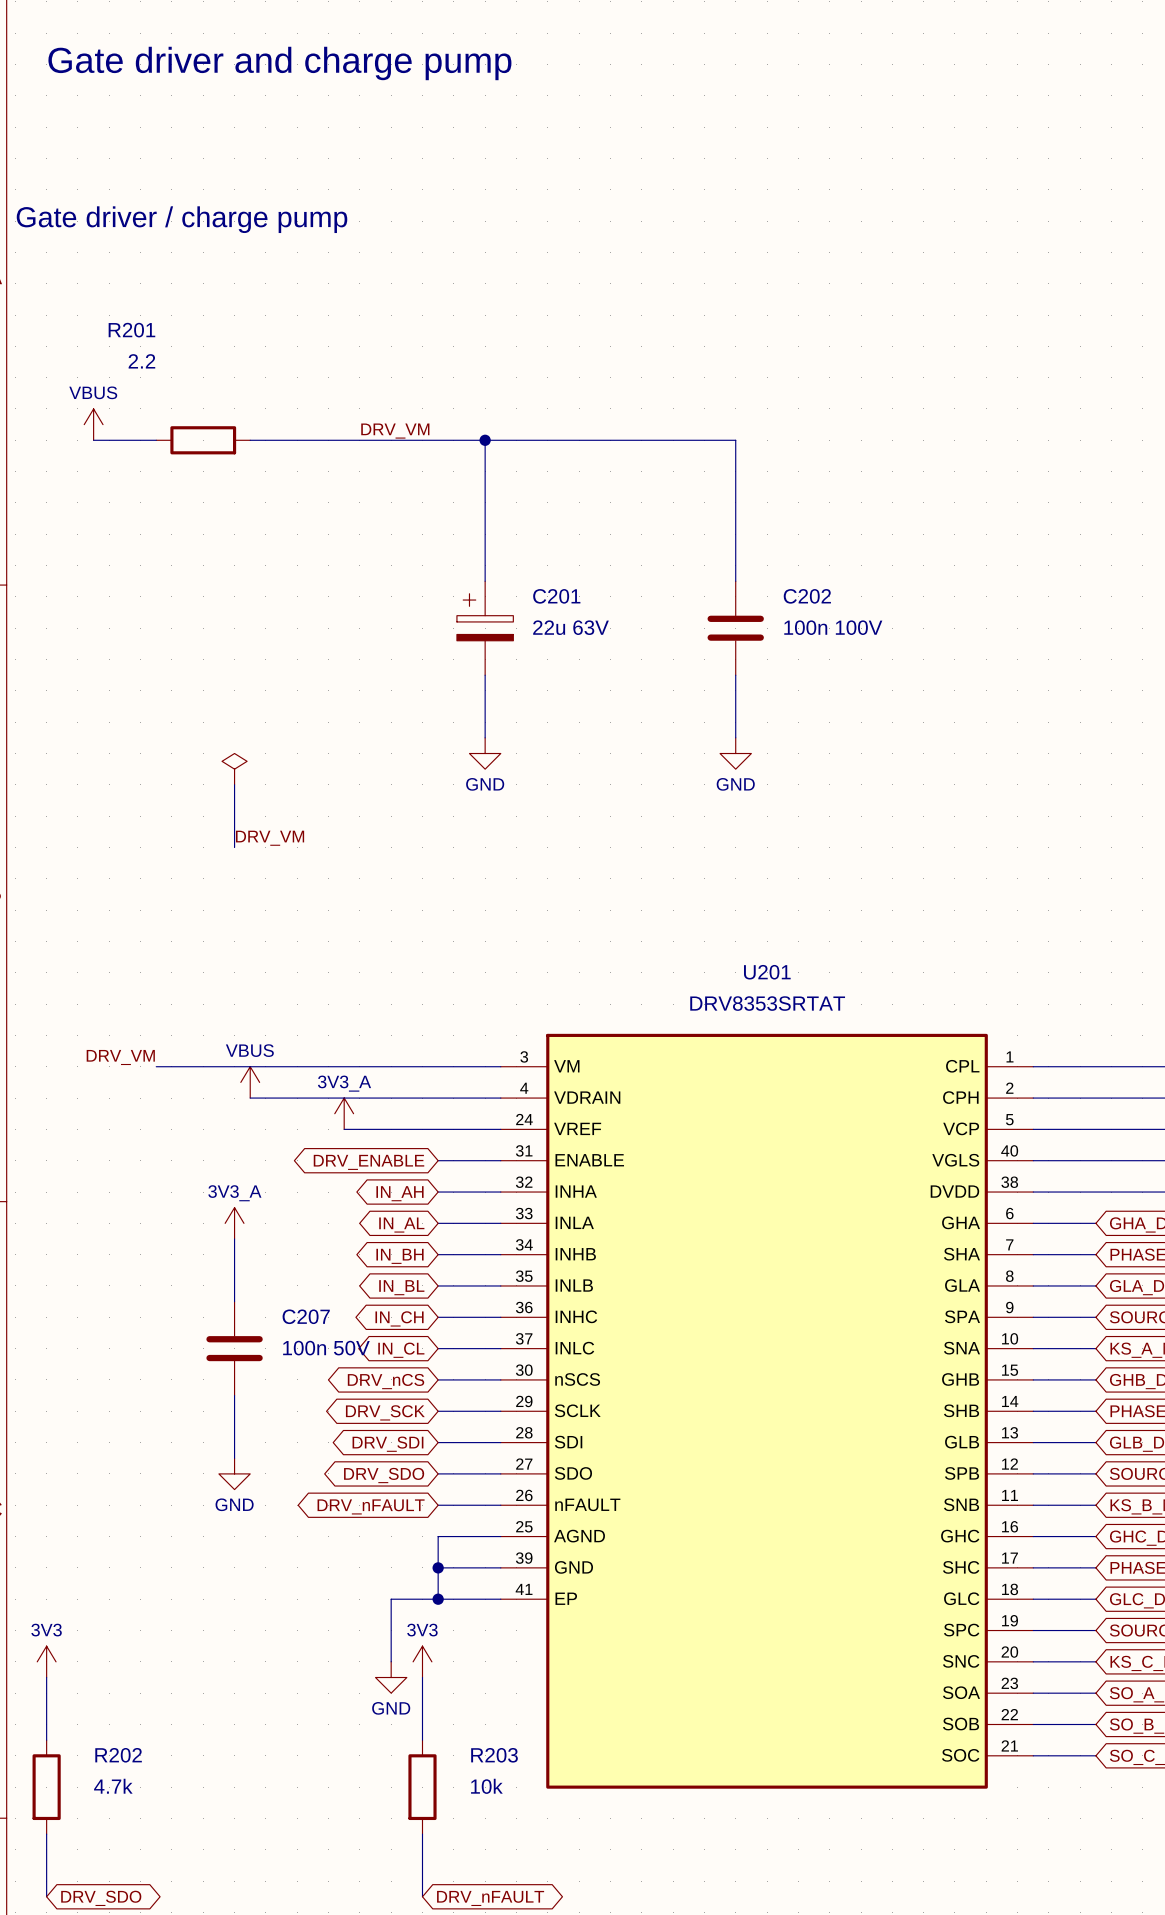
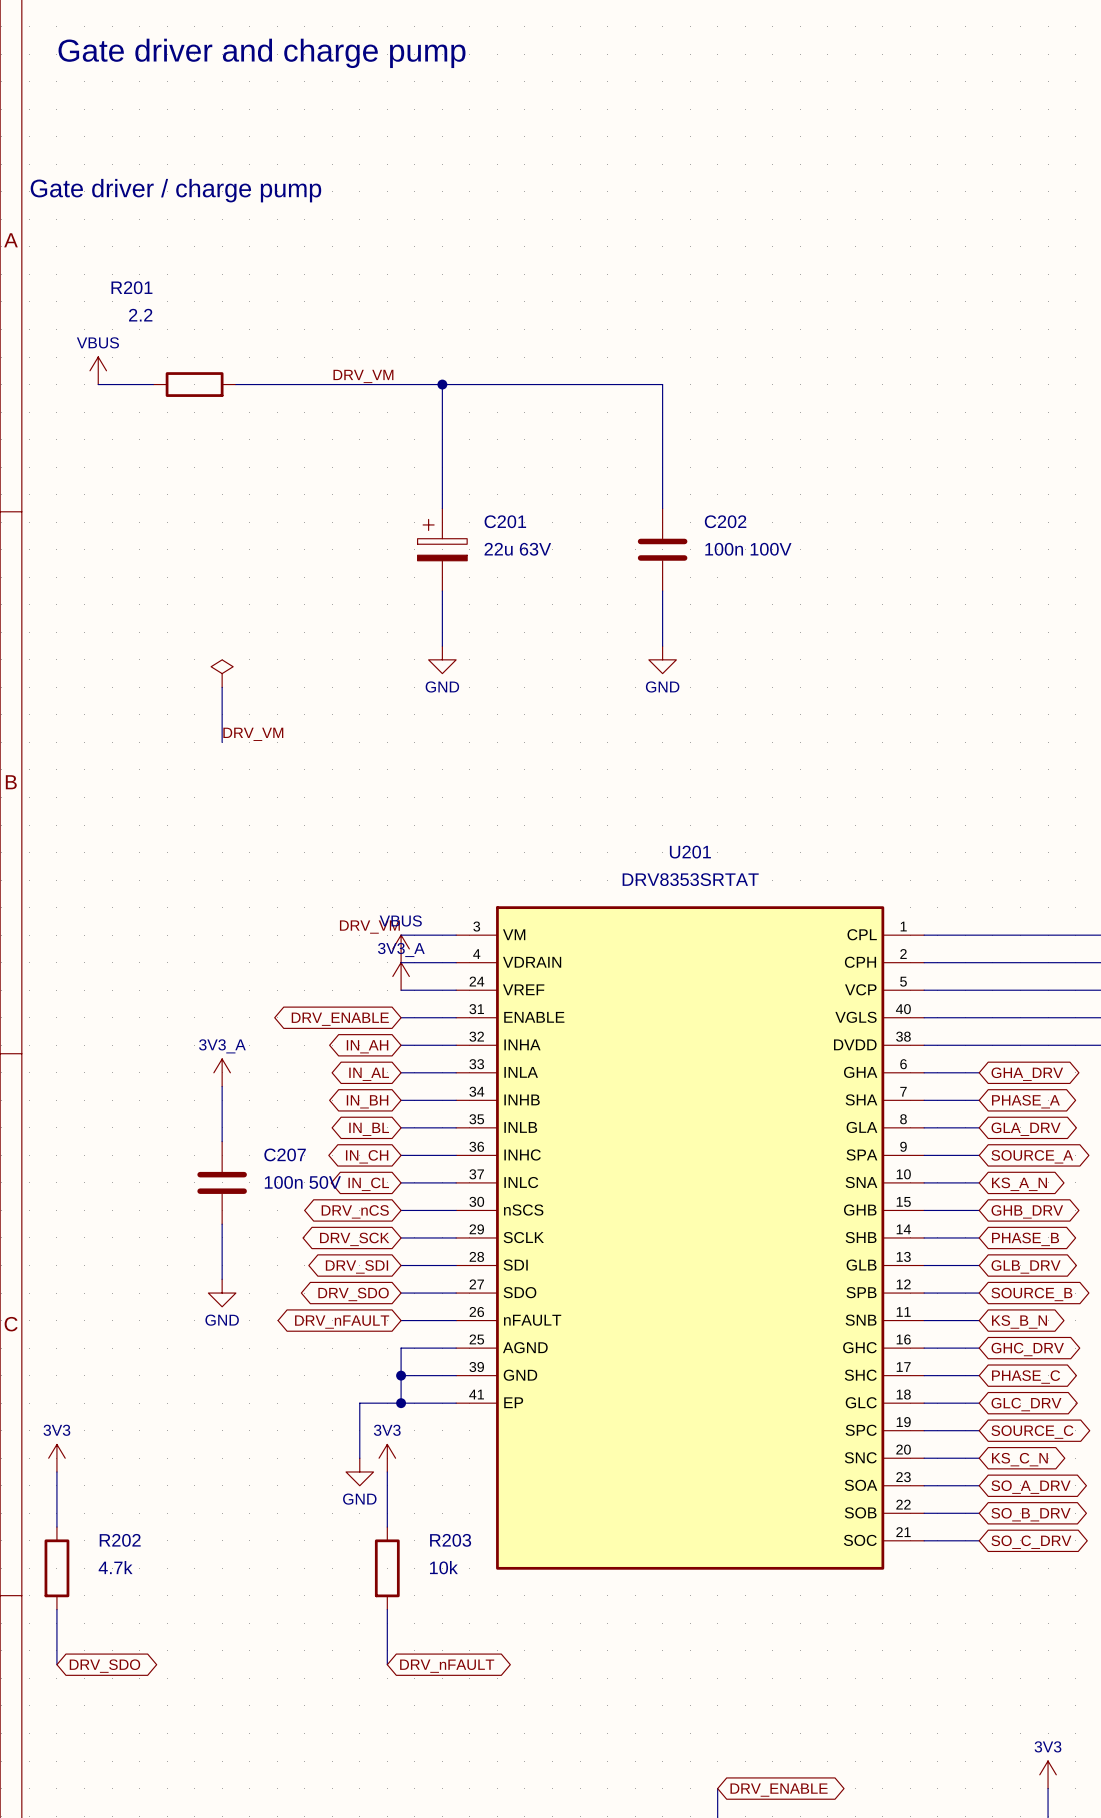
label position: DRV_VM (120, 1057) -> DRV_VM (369, 927)
wire: (156, 1066) (438, 1066) -> none
power symbol position: VBUS (250, 1082) -> VBUS (401, 948)
wire: (250, 1098) (438, 1098) -> none
power symbol position: 3V3_A (344, 1113) -> 3V3_A (401, 976)
wire: (344, 1129) (438, 1129) -> none

